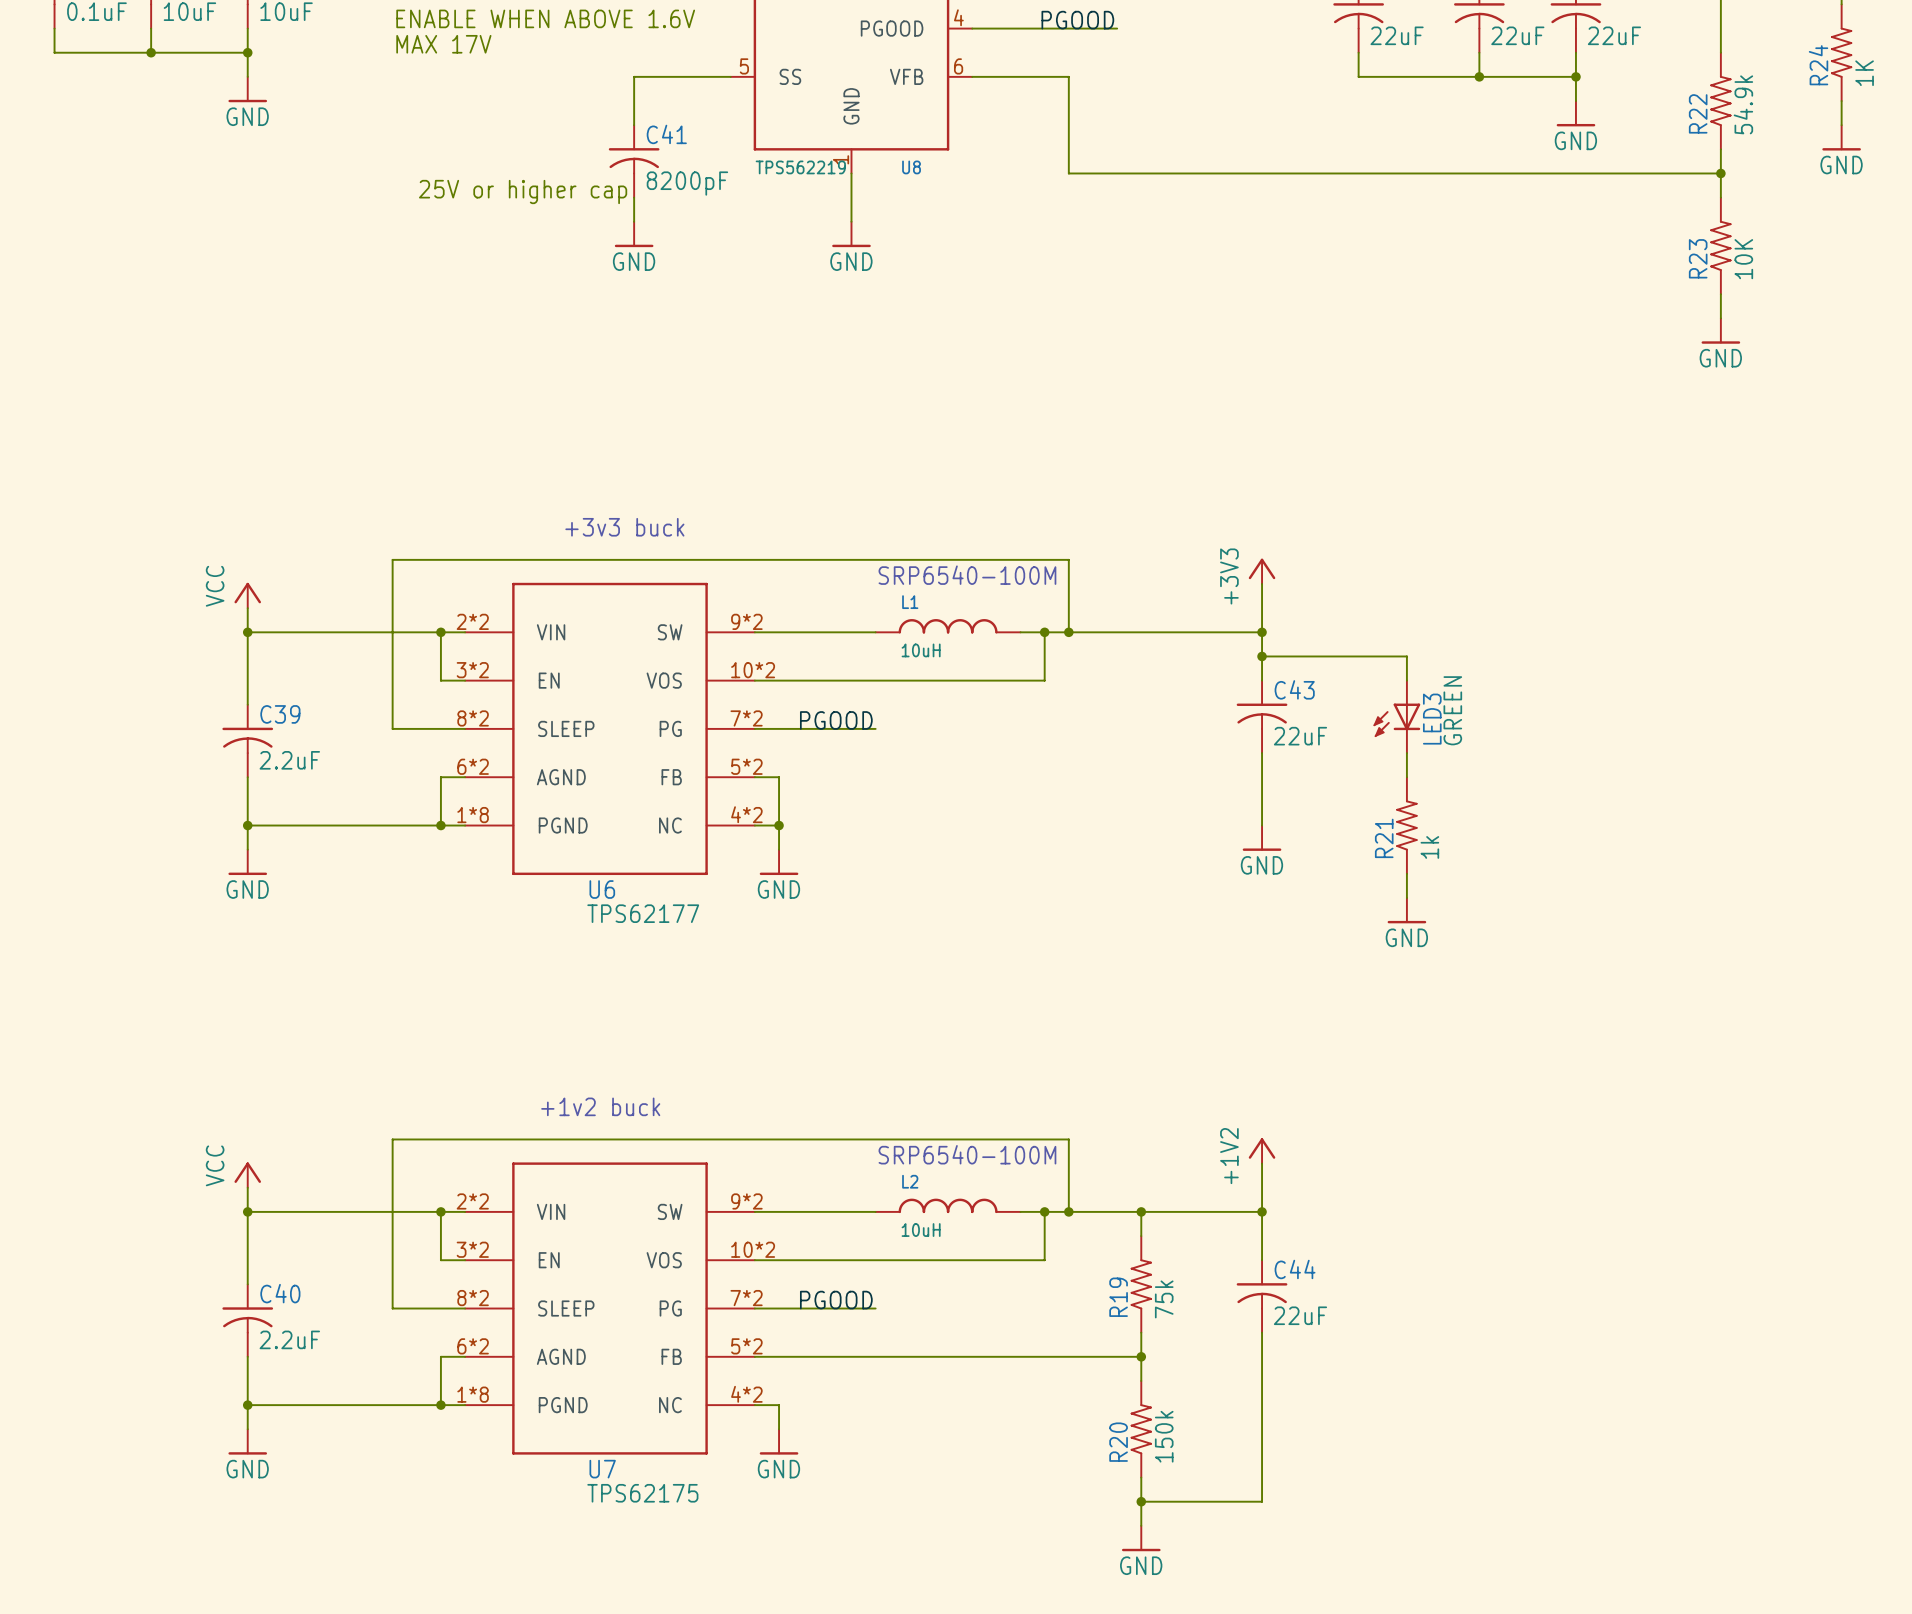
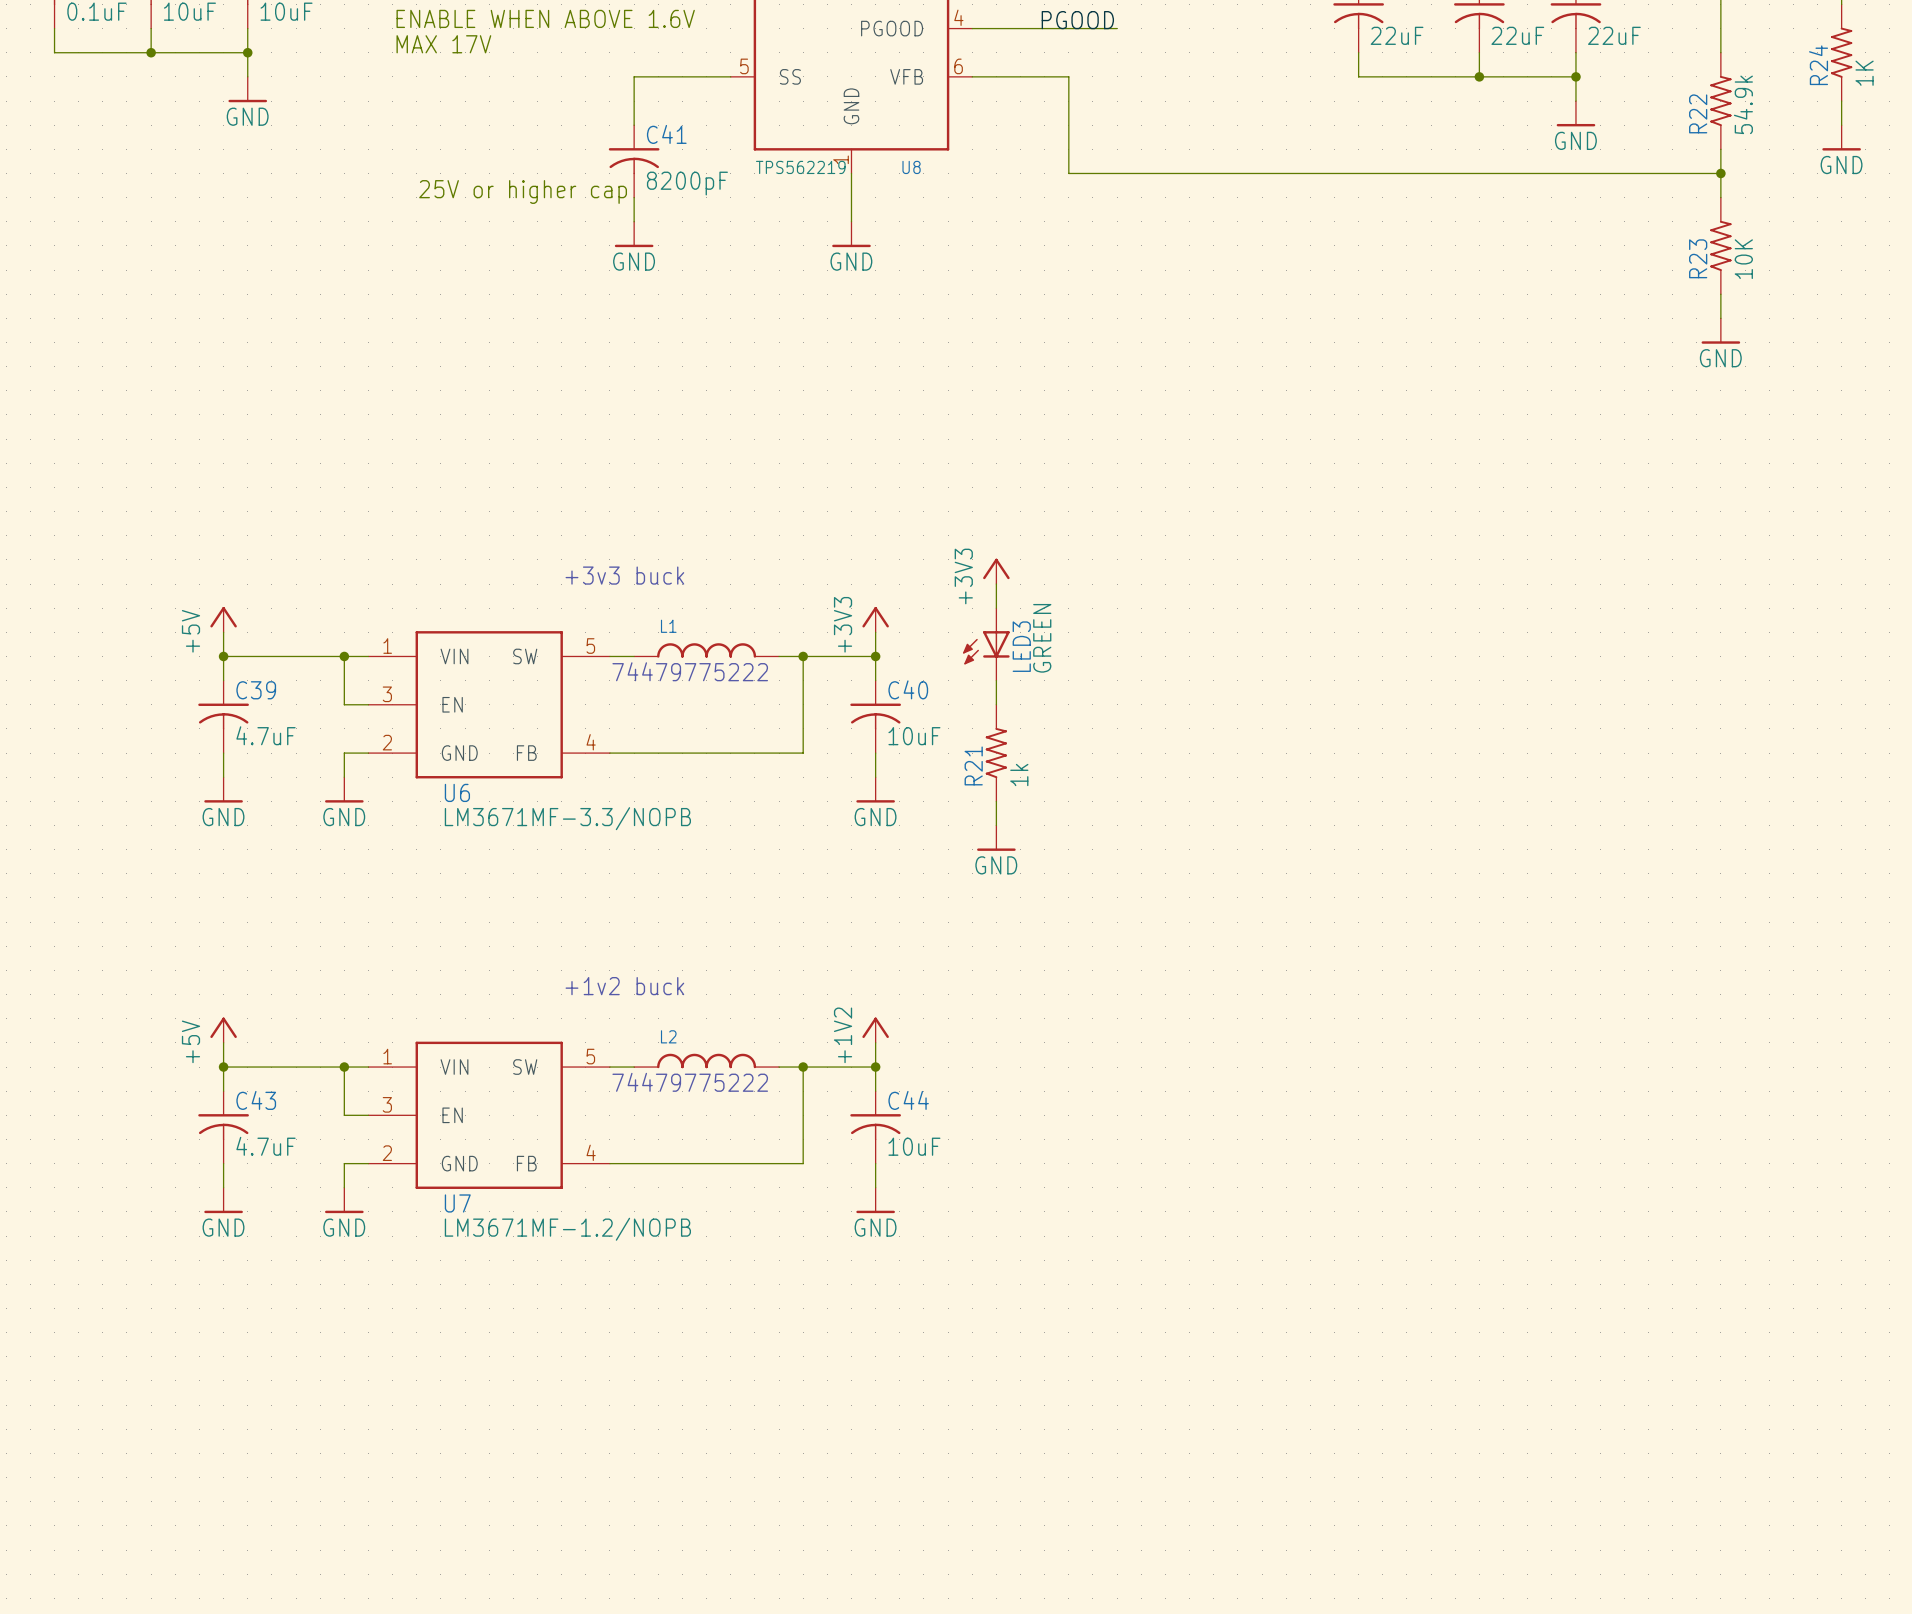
text position: +3v3 buck (624, 527) -> +3v3 buck (624, 575)
power symbol: none -> +3V3 (996, 571)
power symbol: +3V3 (1262, 571) -> none
text: SRP6540-100M (967, 575) -> none
U6 symbol: [465, 582, 755, 876] -> [368, 631, 610, 779]
wire: none -> (996, 584) (996, 608)
wire: (1262, 584) (1262, 680) -> none
power symbol: VCC (247, 595) -> none
wire: (247, 608) (247, 704) -> none
power symbol: none -> +5V (223, 619)
power symbol: none -> +3V3 (875, 619)
L1 position: (948, 626) -> (706, 650)
wire: none -> (223, 632) (223, 680)
wire: (247, 632) (465, 632) -> none
junction position: (247, 632) -> (223, 656)
wire: (440, 632) (440, 680) (465, 680) -> (344, 656) (344, 704) (368, 704)
junction: (440, 632) -> none
wire: (754, 632) (875, 632) -> (875, 680) (875, 632)
wire: (1020, 632) (1262, 632) -> none
wire: (1044, 632) (1044, 680) (754, 680) -> none
junction: (1044, 632) -> none
wire: (1068, 632) (1068, 559) (392, 559) (392, 728) (465, 728) -> none
junction: (1068, 632) -> none
junction: (1262, 632) -> none
L1 value: 10uH (921, 650) -> none
wire: none -> (223, 656) (368, 656)
junction: none -> (344, 656)
wire: none -> (779, 656) (875, 656)
wire: none -> (803, 656) (803, 753) (609, 753)
junction: none -> (803, 656)
junction: none -> (875, 656)
wire: (1262, 656) (1406, 656) (1406, 680) -> none
junction: (1262, 656) -> none
text: none -> 74479775222 (690, 671)
wire: none -> (996, 680) (996, 704)
C43 position: (1262, 716) -> (223, 1127)
LED3 position: (1396, 716) -> (986, 644)
label: PGOOD (836, 720) -> none
wire: (754, 728) (875, 728) -> none
C43 value: 22uF (1300, 736) -> 4.7uF (266, 1146)
C39 position: (247, 740) -> (223, 716)
wire: none -> (223, 753) (223, 777)
wire: none -> (368, 753) (344, 753) (344, 777)
wire: none -> (875, 753) (875, 777)
wire: (1262, 753) (1262, 825) -> none
wire: (1406, 753) (1406, 777) -> none
C39 value: 2.2uF (289, 760) -> 4.7uF (266, 735)
wire: (247, 777) (247, 849) -> none
wire: (465, 777) (440, 777) (440, 825) -> none
wire: (754, 777) (779, 777) (779, 849) -> none
power symbol: none -> GND (223, 789)
power symbol: none -> GND (344, 789)
power symbol: none -> GND (875, 789)
wire: none -> (996, 801) (996, 825)
wire: (247, 825) (465, 825) -> none
junction: (247, 825) -> none
junction: (440, 825) -> none
wire: (754, 825) (779, 825) -> (609, 656) (634, 656)
junction: (779, 825) -> none
R21 position: (1406, 825) -> (996, 753)
power symbol: none -> GND (996, 838)
power symbol: GND (1262, 838) -> none
power symbol: GND (247, 862) -> none
power symbol: GND (779, 862) -> none
wire: (1406, 873) (1406, 897) -> none
U6 name position: U6 (602, 889) -> U6 (457, 792)
power symbol: GND (1406, 910) -> none
U6 value: TPS62177 (643, 913) -> LM3671MF-3.3/NOPB (567, 818)
power symbol: none -> +5V (223, 1030)
power symbol: none -> +1V2 (875, 1030)
wire: none -> (223, 1042) (223, 1091)
wire: none -> (875, 1042) (875, 1091)
wire: none -> (223, 1067) (368, 1067)
junction: none -> (223, 1067)
junction: none -> (344, 1067)
wire: none -> (609, 1067) (634, 1067)
wire: none -> (779, 1067) (875, 1067)
wire: none -> (803, 1067) (803, 1163) (609, 1163)
junction: none -> (803, 1067)
junction: none -> (875, 1067)
text: none -> 74479775222 (690, 1082)
text position: +1v2 buck (600, 1106) -> +1v2 buck (624, 986)
power symbol: +1V2 (1262, 1150) -> none
text: SRP6540-100M (967, 1154) -> none
U7 symbol: [465, 1162, 755, 1455] -> [368, 1041, 610, 1189]
wire: none -> (223, 1163) (223, 1187)
wire: none -> (368, 1163) (344, 1163) (344, 1187)
wire: none -> (875, 1163) (875, 1187)
wire: (1262, 1163) (1262, 1260) -> none
power symbol: VCC (247, 1175) -> none
wire: (247, 1187) (247, 1284) -> none
power symbol: none -> GND (223, 1200)
power symbol: none -> GND (344, 1200)
power symbol: none -> GND (875, 1200)
L2 position: (948, 1205) -> (706, 1060)
wire: (247, 1211) (465, 1211) -> none
junction: (247, 1211) -> none
wire: (440, 1211) (440, 1260) (465, 1260) -> (344, 1067) (344, 1115) (368, 1115)
junction: (440, 1211) -> none
wire: (754, 1211) (875, 1211) -> none
wire: (1020, 1211) (1262, 1211) -> none
wire: (1044, 1211) (1044, 1260) (754, 1260) -> none
junction: (1044, 1211) -> none
wire: (1068, 1211) (1068, 1139) (392, 1139) (392, 1308) (465, 1308) -> none
junction: (1068, 1211) -> none
wire: (1141, 1211) (1141, 1236) -> none
junction: (1141, 1211) -> none
junction: (1262, 1211) -> none
L2 value: 10uH (921, 1230) -> none
R19: 75k (1141, 1284) -> none
C44 position: (1262, 1296) -> (875, 1127)
label: PGOOD (836, 1300) -> none
wire: (754, 1308) (875, 1308) -> none
C44 value: 22uF (1300, 1315) -> 10uF (914, 1146)
C40 position: (247, 1320) -> (875, 716)
wire: (1141, 1332) (1141, 1380) -> none
wire: (1262, 1332) (1262, 1501) (1141, 1501) -> none
C40 value: 2.2uF (289, 1339) -> 10uF (914, 736)
wire: (247, 1356) (247, 1429) -> none
wire: (465, 1356) (440, 1356) (440, 1405) -> none
wire: (754, 1356) (1141, 1356) -> none
junction: (1141, 1356) -> none
wire: (247, 1405) (465, 1405) -> none
junction: (247, 1405) -> none
junction: (440, 1405) -> none
wire: (754, 1405) (779, 1405) (779, 1429) -> none
R20: 150k (1141, 1429) -> none
power symbol: GND (247, 1441) -> none
power symbol: GND (779, 1441) -> none
U7 name position: U7 (602, 1469) -> U7 (457, 1203)
wire: (1141, 1477) (1141, 1525) -> none
U7 value: TPS62175 (642, 1493) -> LM3671MF-1.2/NOPB (567, 1229)
junction: (1141, 1501) -> none
power symbol: GND (1141, 1538) -> none

